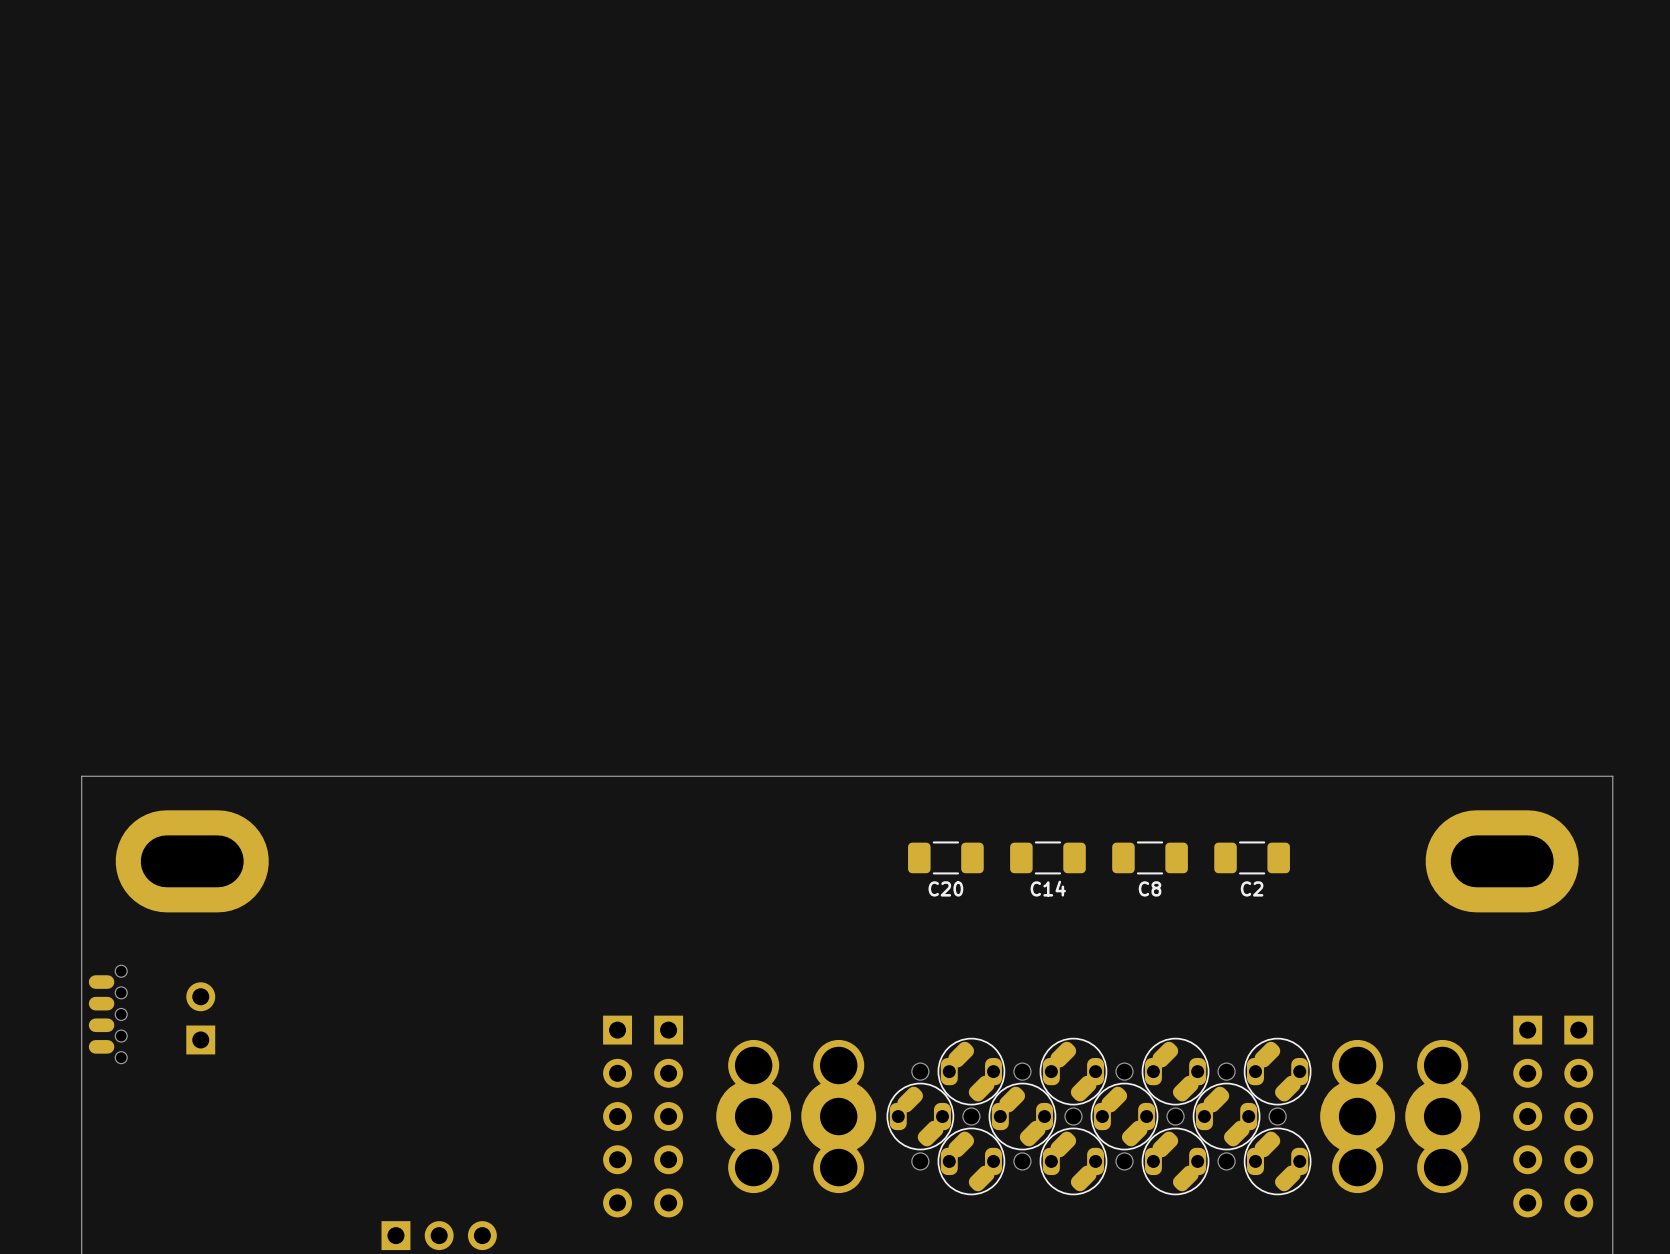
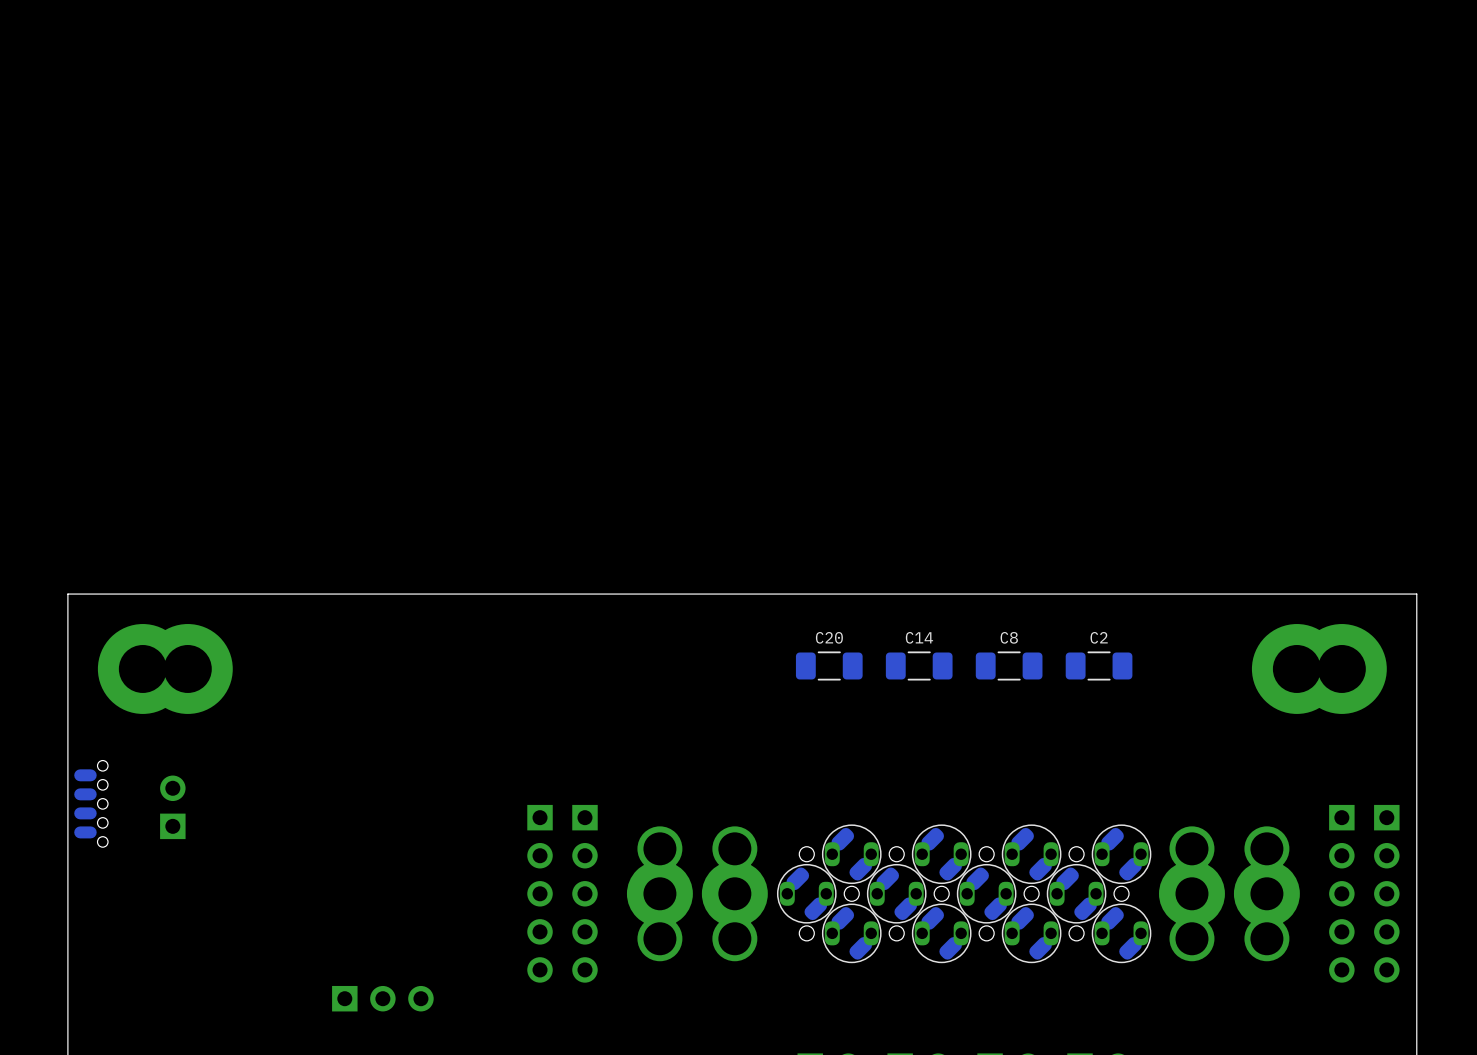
part footprint: [115, 810, 269, 913] -> [97, 624, 233, 714]
part footprint: [1425, 810, 1579, 913] -> [1251, 624, 1387, 714]
C20 name position: C20 (945, 888) -> C20 (829, 637)
C14 name position: C14 (1048, 888) -> C14 (919, 637)
C8 name position: C8 (1150, 888) -> C8 (1009, 637)
C2 name position: C2 (1252, 888) -> C2 (1099, 637)

